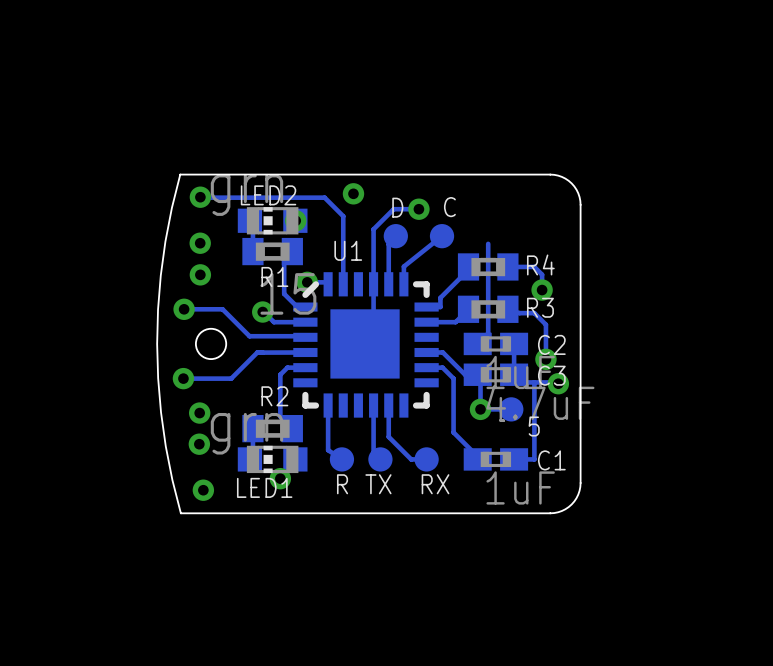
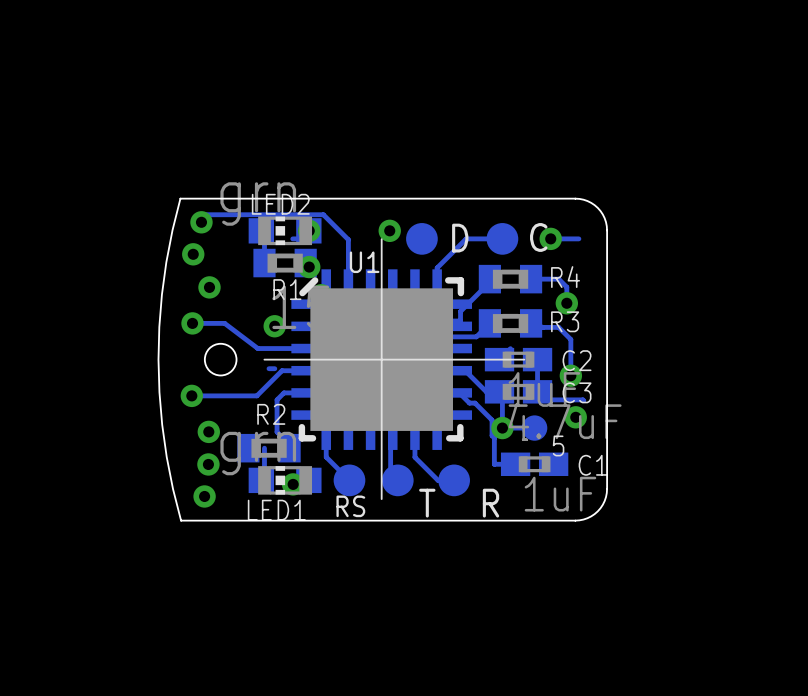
via: (353, 193) -> none
track: (200, 197) (324, 197) (343, 216) (343, 284) -> none
via position: (200, 197) -> (201, 222)
D name position: D (397, 207) -> D (460, 238)
track: (418, 209) (393, 209) (373, 229) (373, 343) -> none
via: (418, 209) -> none
track: none -> (201, 222) (201, 214) (323, 214) (348, 239) (348, 281)
via: none -> (389, 230)
board edge: (580, 220) (580, 200) (576, 189) (568, 180) (554, 174) (180, 174) (165, 241) (160, 275) (157, 343) (161, 412) (172, 480) (180, 513) (554, 513) (568, 507) (576, 498) (580, 486) (580, 467) -> (607, 230) (604, 218) (600, 211) (591, 202) (579, 198) (180, 198) (166, 262) (161, 294) (158, 359) (162, 424) (173, 489) (181, 520) (579, 520) (591, 516) (600, 508) (604, 501) (607, 488)
D footprint: [383, 224, 408, 249] -> [406, 223, 438, 255]
track: none -> (297, 238) (292, 238)
track: none -> (502, 238) (466, 238) (437, 267) (437, 281)
C: none -> (502, 238)
via: none -> (550, 238)
track: none -> (578, 238) (550, 238)
track: (395, 236) (388, 244) (388, 284) -> none
track: (442, 236) (403, 266) (403, 284) -> none
C: (442, 236) -> none
via position: (200, 243) -> (193, 254)
track: (488, 243) (488, 333) -> none
track: (292, 251) (284, 259) (284, 293) (297, 307) (305, 307) -> none
via: none -> (309, 267)
U1 footprint: [293, 272, 439, 418] -> [264, 239, 525, 500]
track: (214, 309) (222, 309) (249, 336) (305, 337) -> (224, 323) (257, 348) (304, 348)
track: (264, 313) (273, 322) (305, 322) -> none
track: (305, 352) (257, 352) (231, 378) -> (304, 370) (282, 370) (256, 395) (241, 395)
track: (305, 367) (287, 367) (280, 374) (280, 416) (292, 428) -> none
track: (426, 367) (442, 367) (453, 378) (453, 432) (477, 456) (477, 459) -> none
track: none -> (304, 392) (284, 392) (277, 399) (277, 432) (293, 448) (289, 448)
track: none -> (459, 392) (469, 403) (475, 403) (492, 420) (494, 464) (515, 464) (515, 461)
track: (534, 382) (534, 459) (514, 459) -> none
via position: (558, 383) -> (575, 417)
track: (328, 405) (328, 450) (341, 459) -> none
track: (388, 405) (388, 436) (411, 459) (418, 459) -> (414, 437) (414, 457) (438, 480)
track: none -> (326, 437) (326, 457) (349, 480)
R2 position: (272, 428) -> (268, 448)
RS: none -> (349, 480)
R: (341, 459) -> none
TX: (380, 459) -> none
T: none -> (397, 480)
RX: (426, 459) -> none
R: none -> (454, 480)
C1 position: (495, 459) -> (534, 464)
via position: (280, 478) -> (293, 484)
via position: (203, 490) -> (204, 496)

